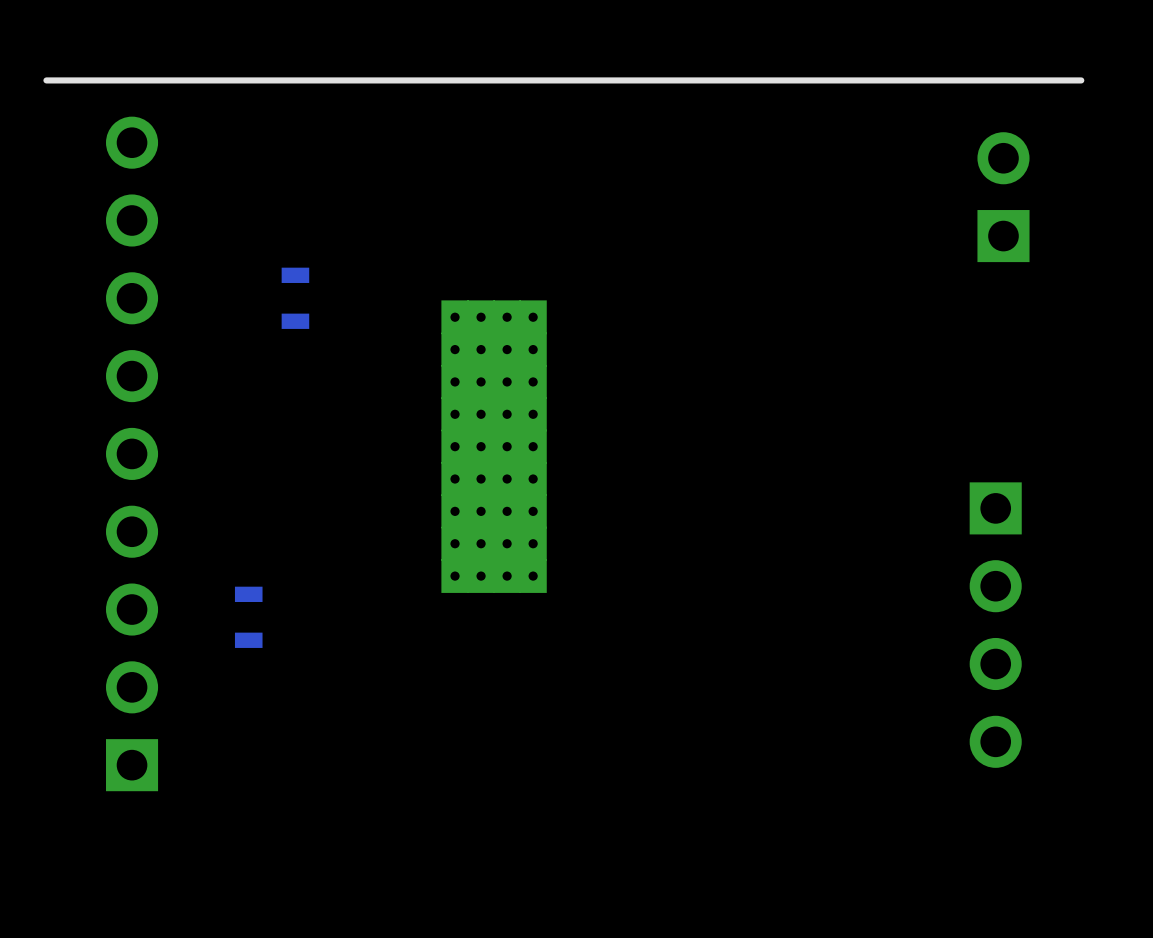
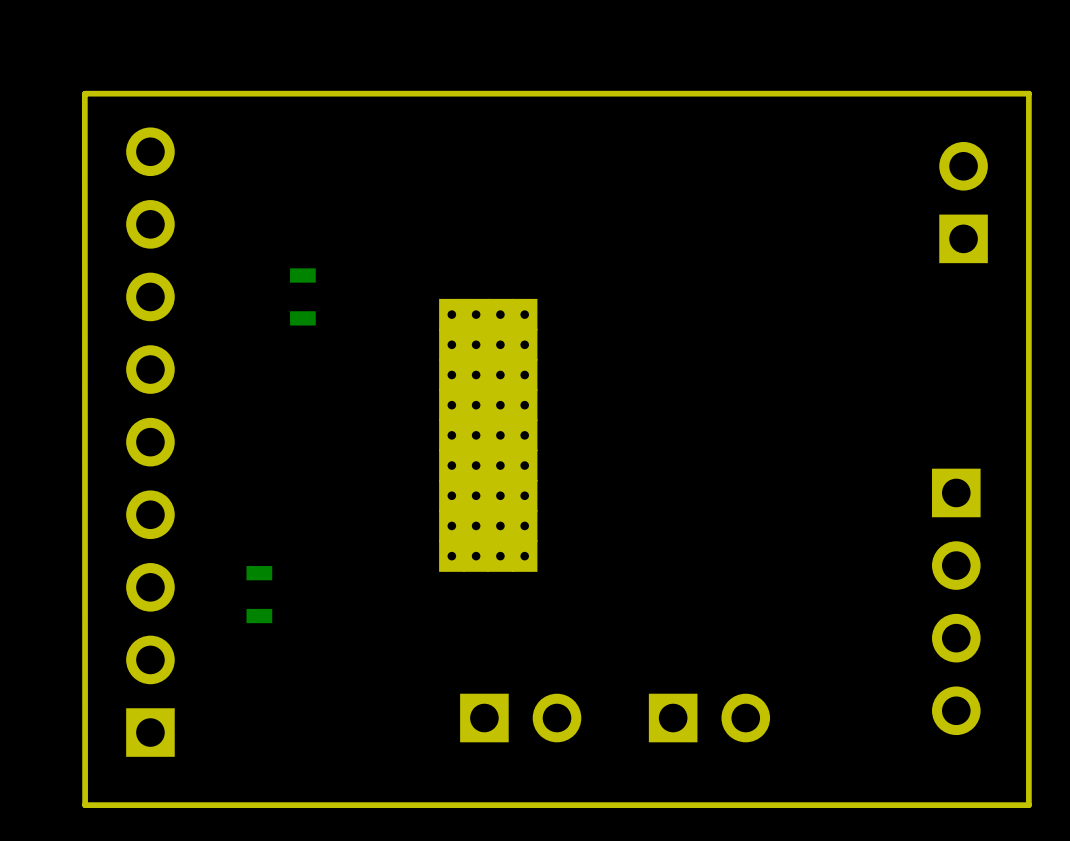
board edge: none -> (85, 93) (1028, 93) (1028, 805) (85, 805) (84, 94)
line: (1081, 80) (46, 80) -> none
part: none -> (520, 718)
part: none -> (709, 718)

